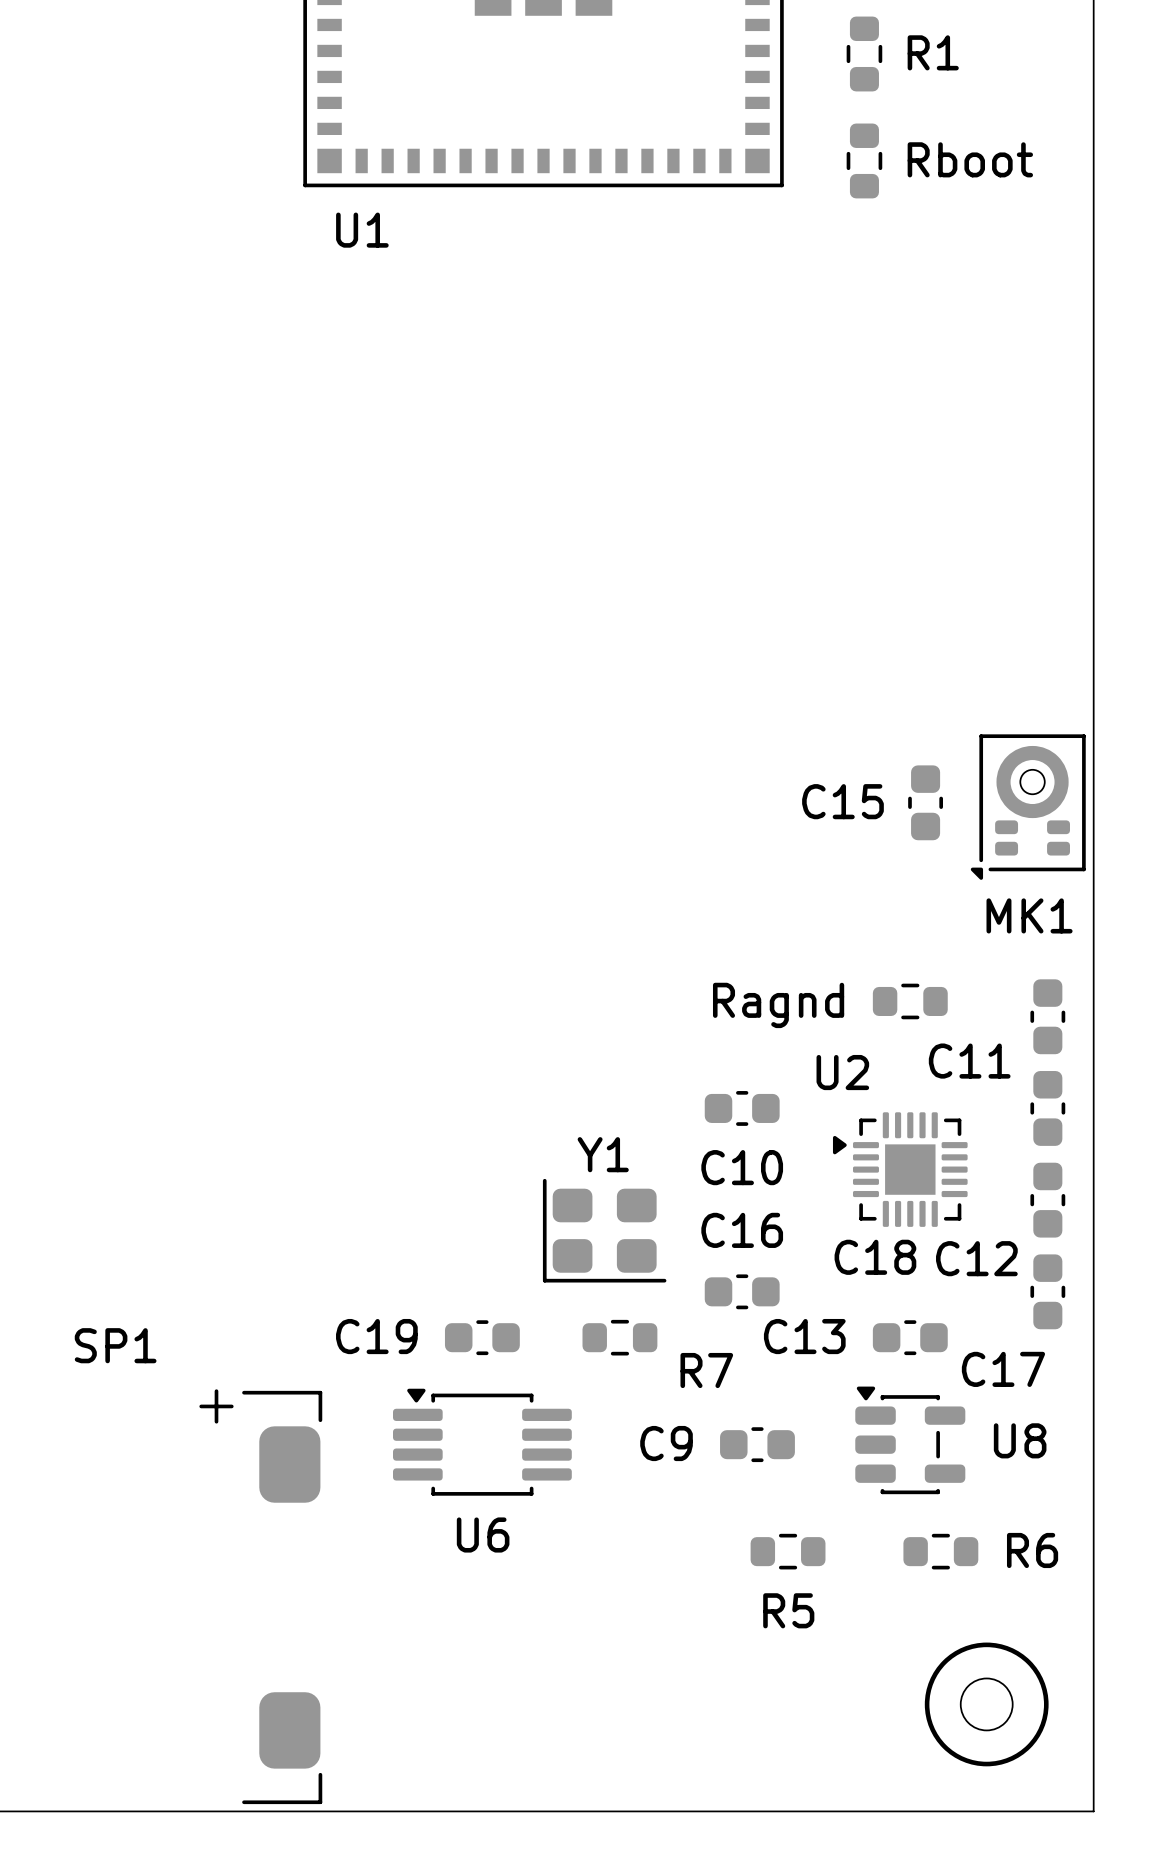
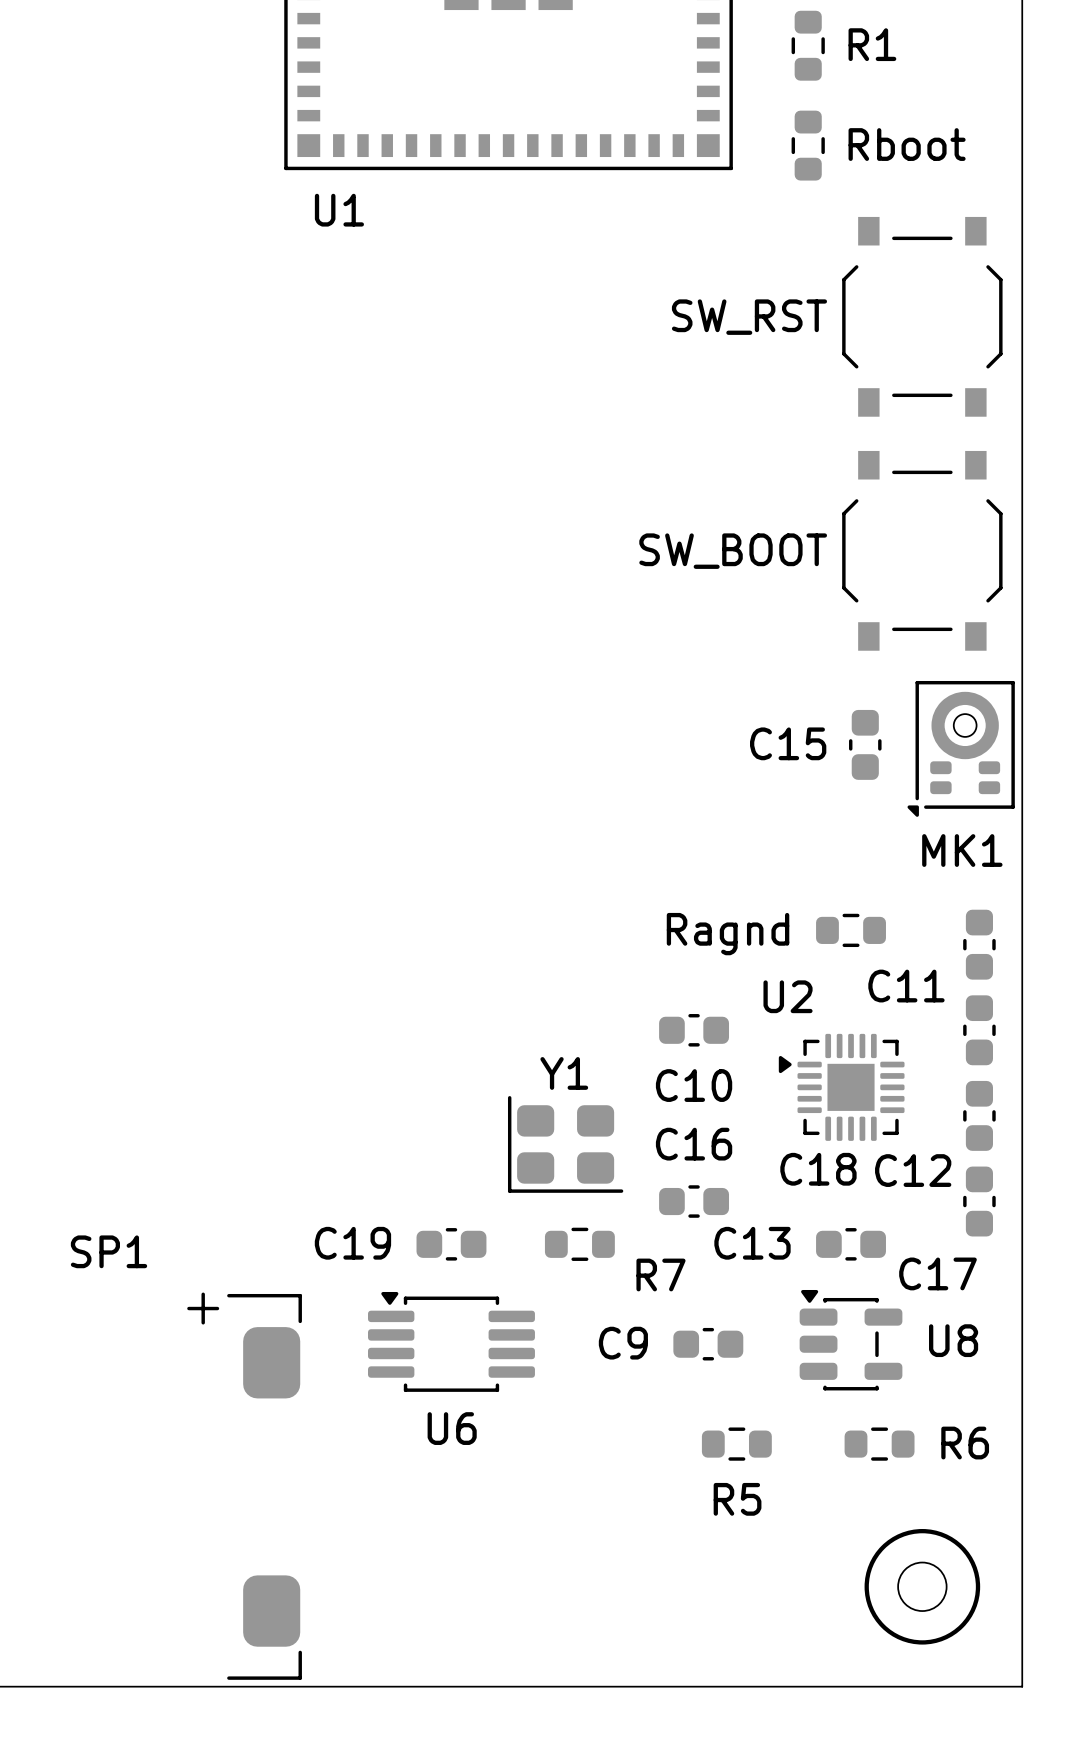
SW_RST: none -> (922, 316)
SW_BOOT: none -> (922, 550)

